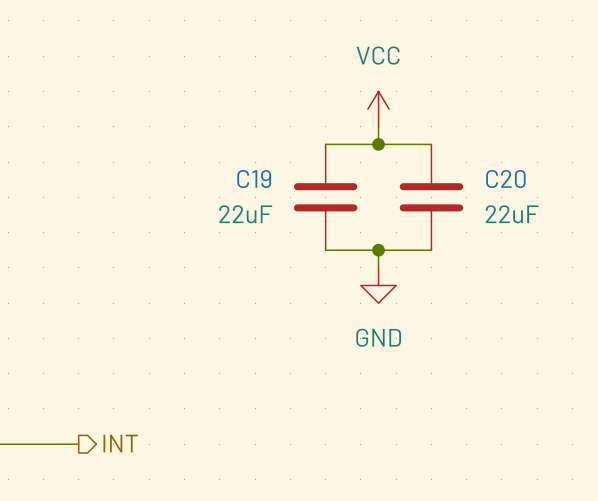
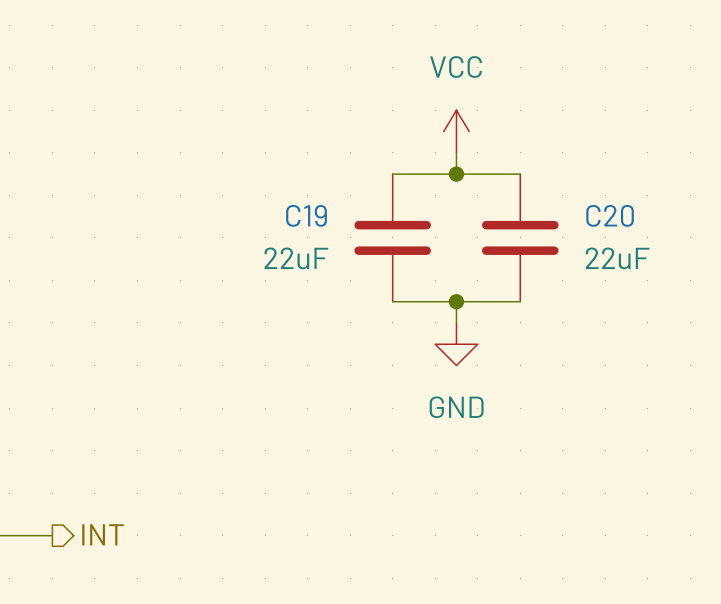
hierarchical label position: INT (120, 443) -> INT (103, 534)
wire: (43, 444) (78, 444) -> none

